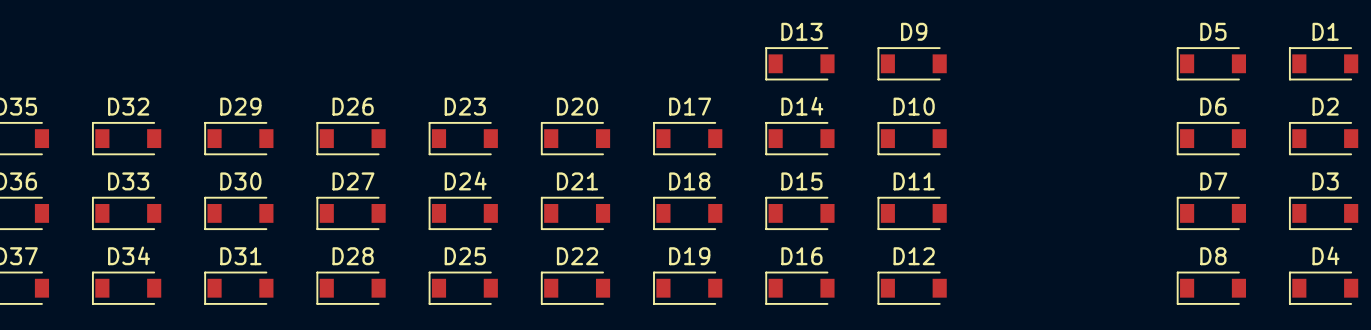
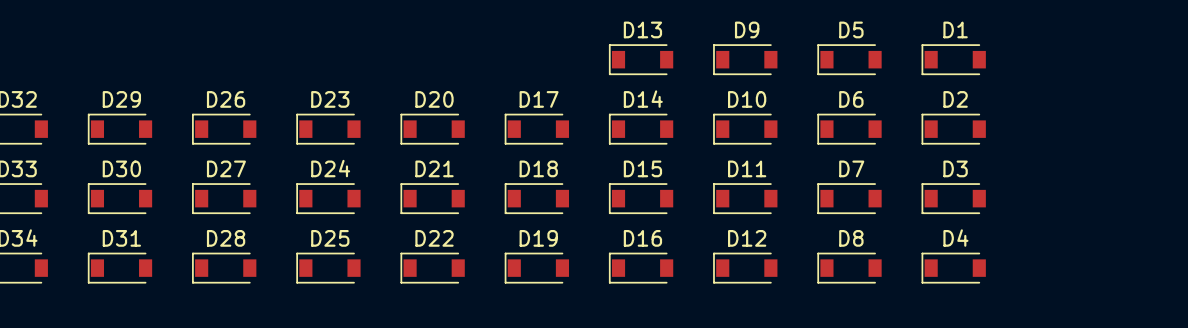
D5 position: (1211, 63) -> (849, 59)
D1 position: (1323, 63) -> (953, 59)
D6 position: (1211, 138) -> (849, 129)
D2 position: (1323, 138) -> (953, 129)
D7 position: (1211, 213) -> (849, 198)
D3 position: (1323, 213) -> (953, 198)
D8 position: (1211, 288) -> (849, 268)
D4 position: (1323, 288) -> (953, 268)

